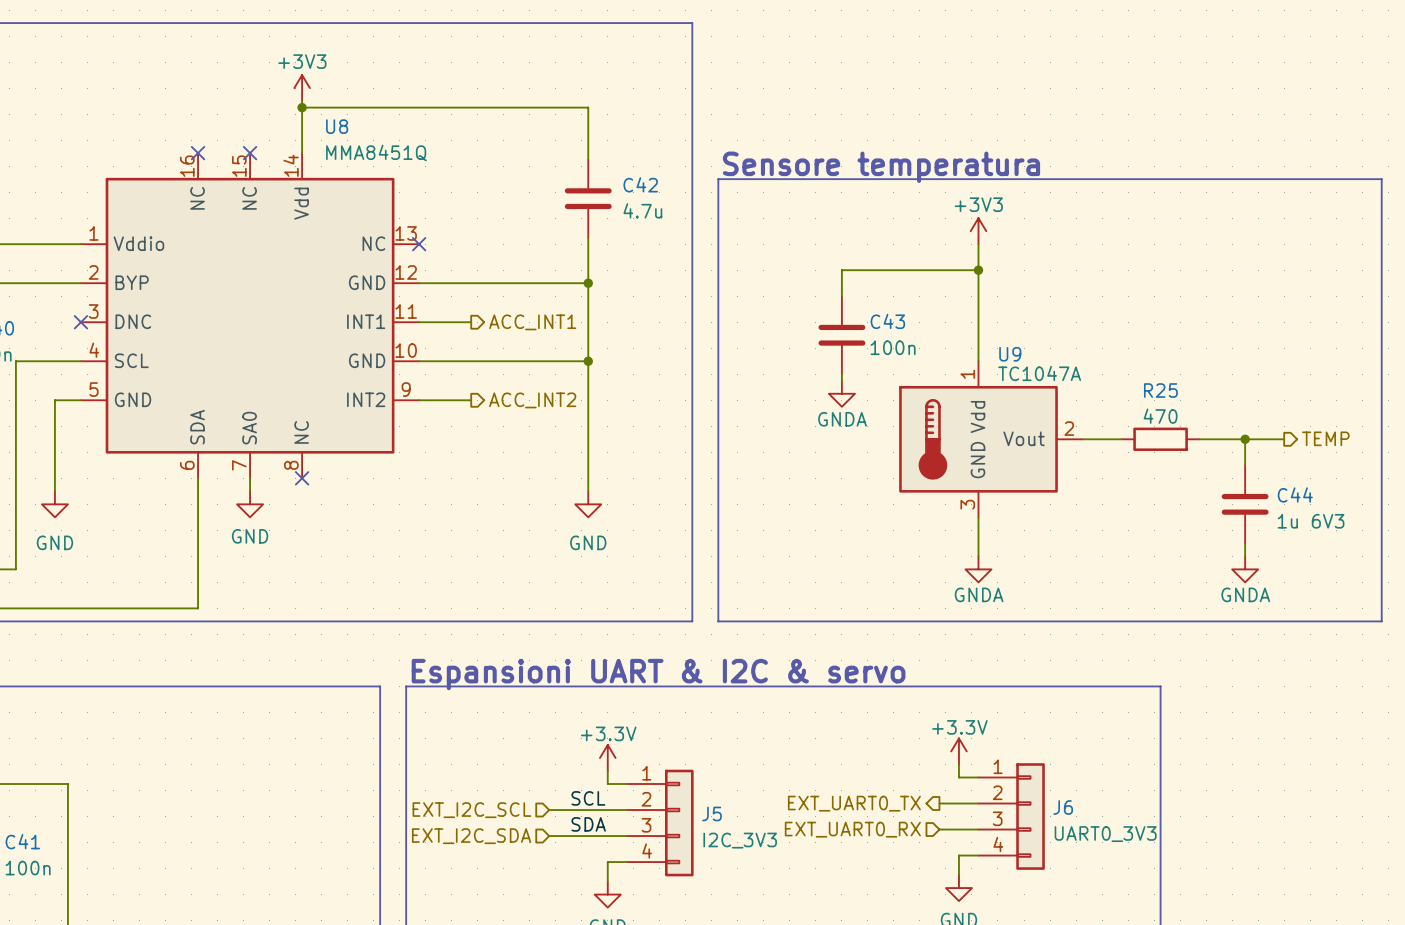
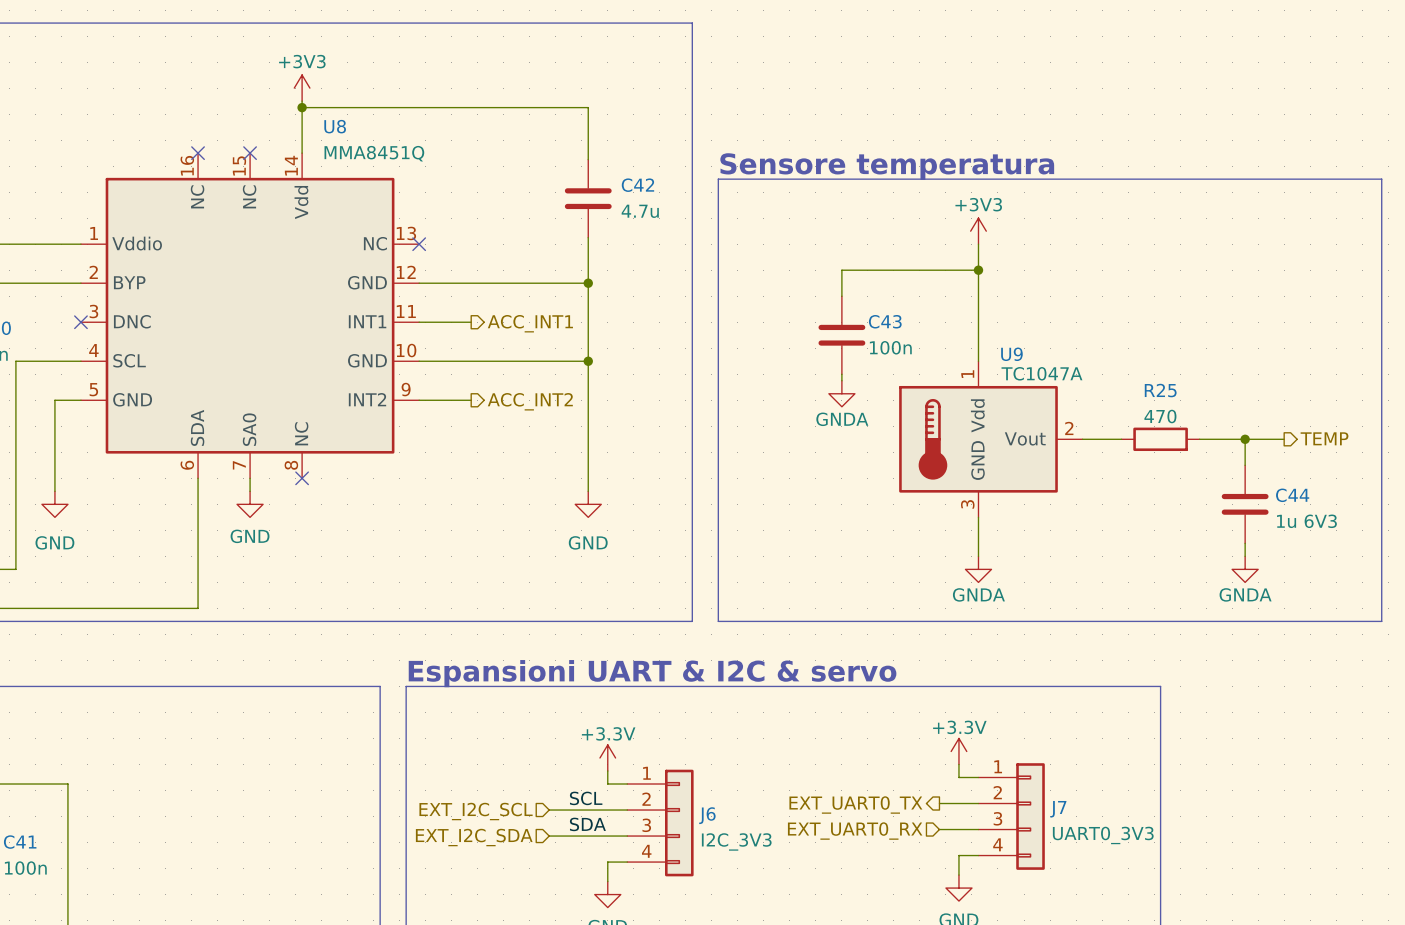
J6 name: J6 (1063, 807) -> J7 (1058, 809)
J5 name: J5 (711, 813) -> J6 (707, 815)

